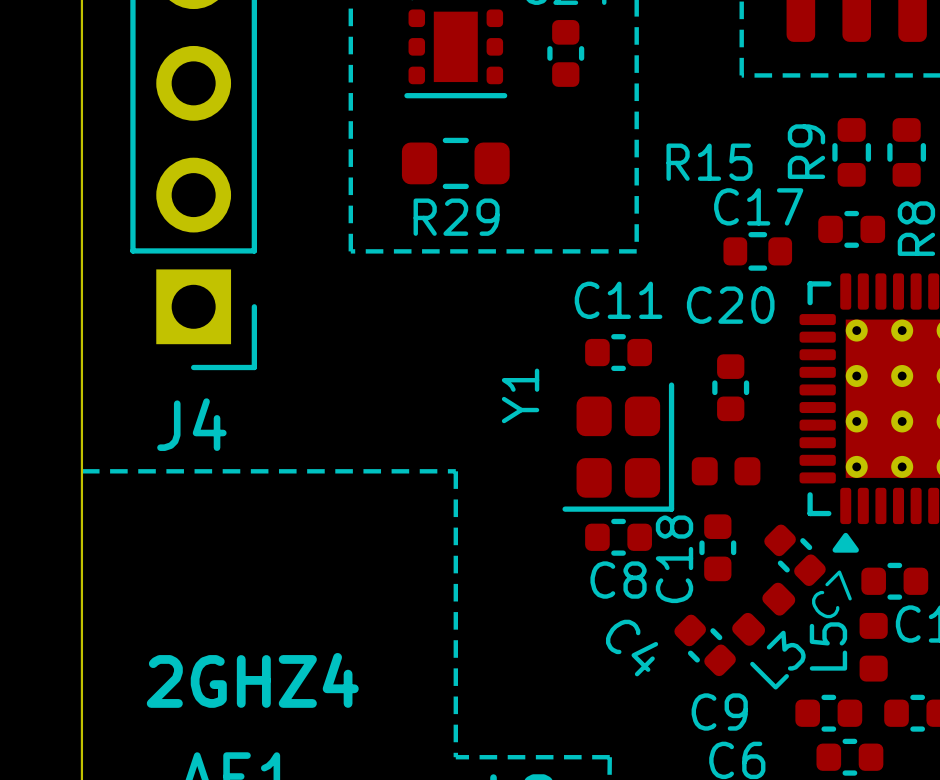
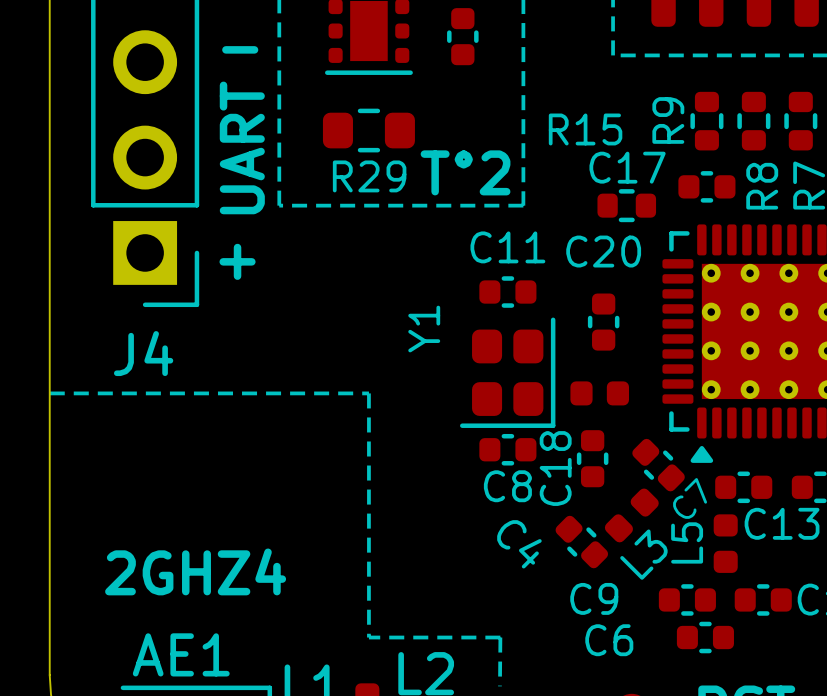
text: none -> - (240, 49)
text: none -> UART (242, 147)
text: none -> T°2 (465, 172)
text: none -> + (237, 261)

